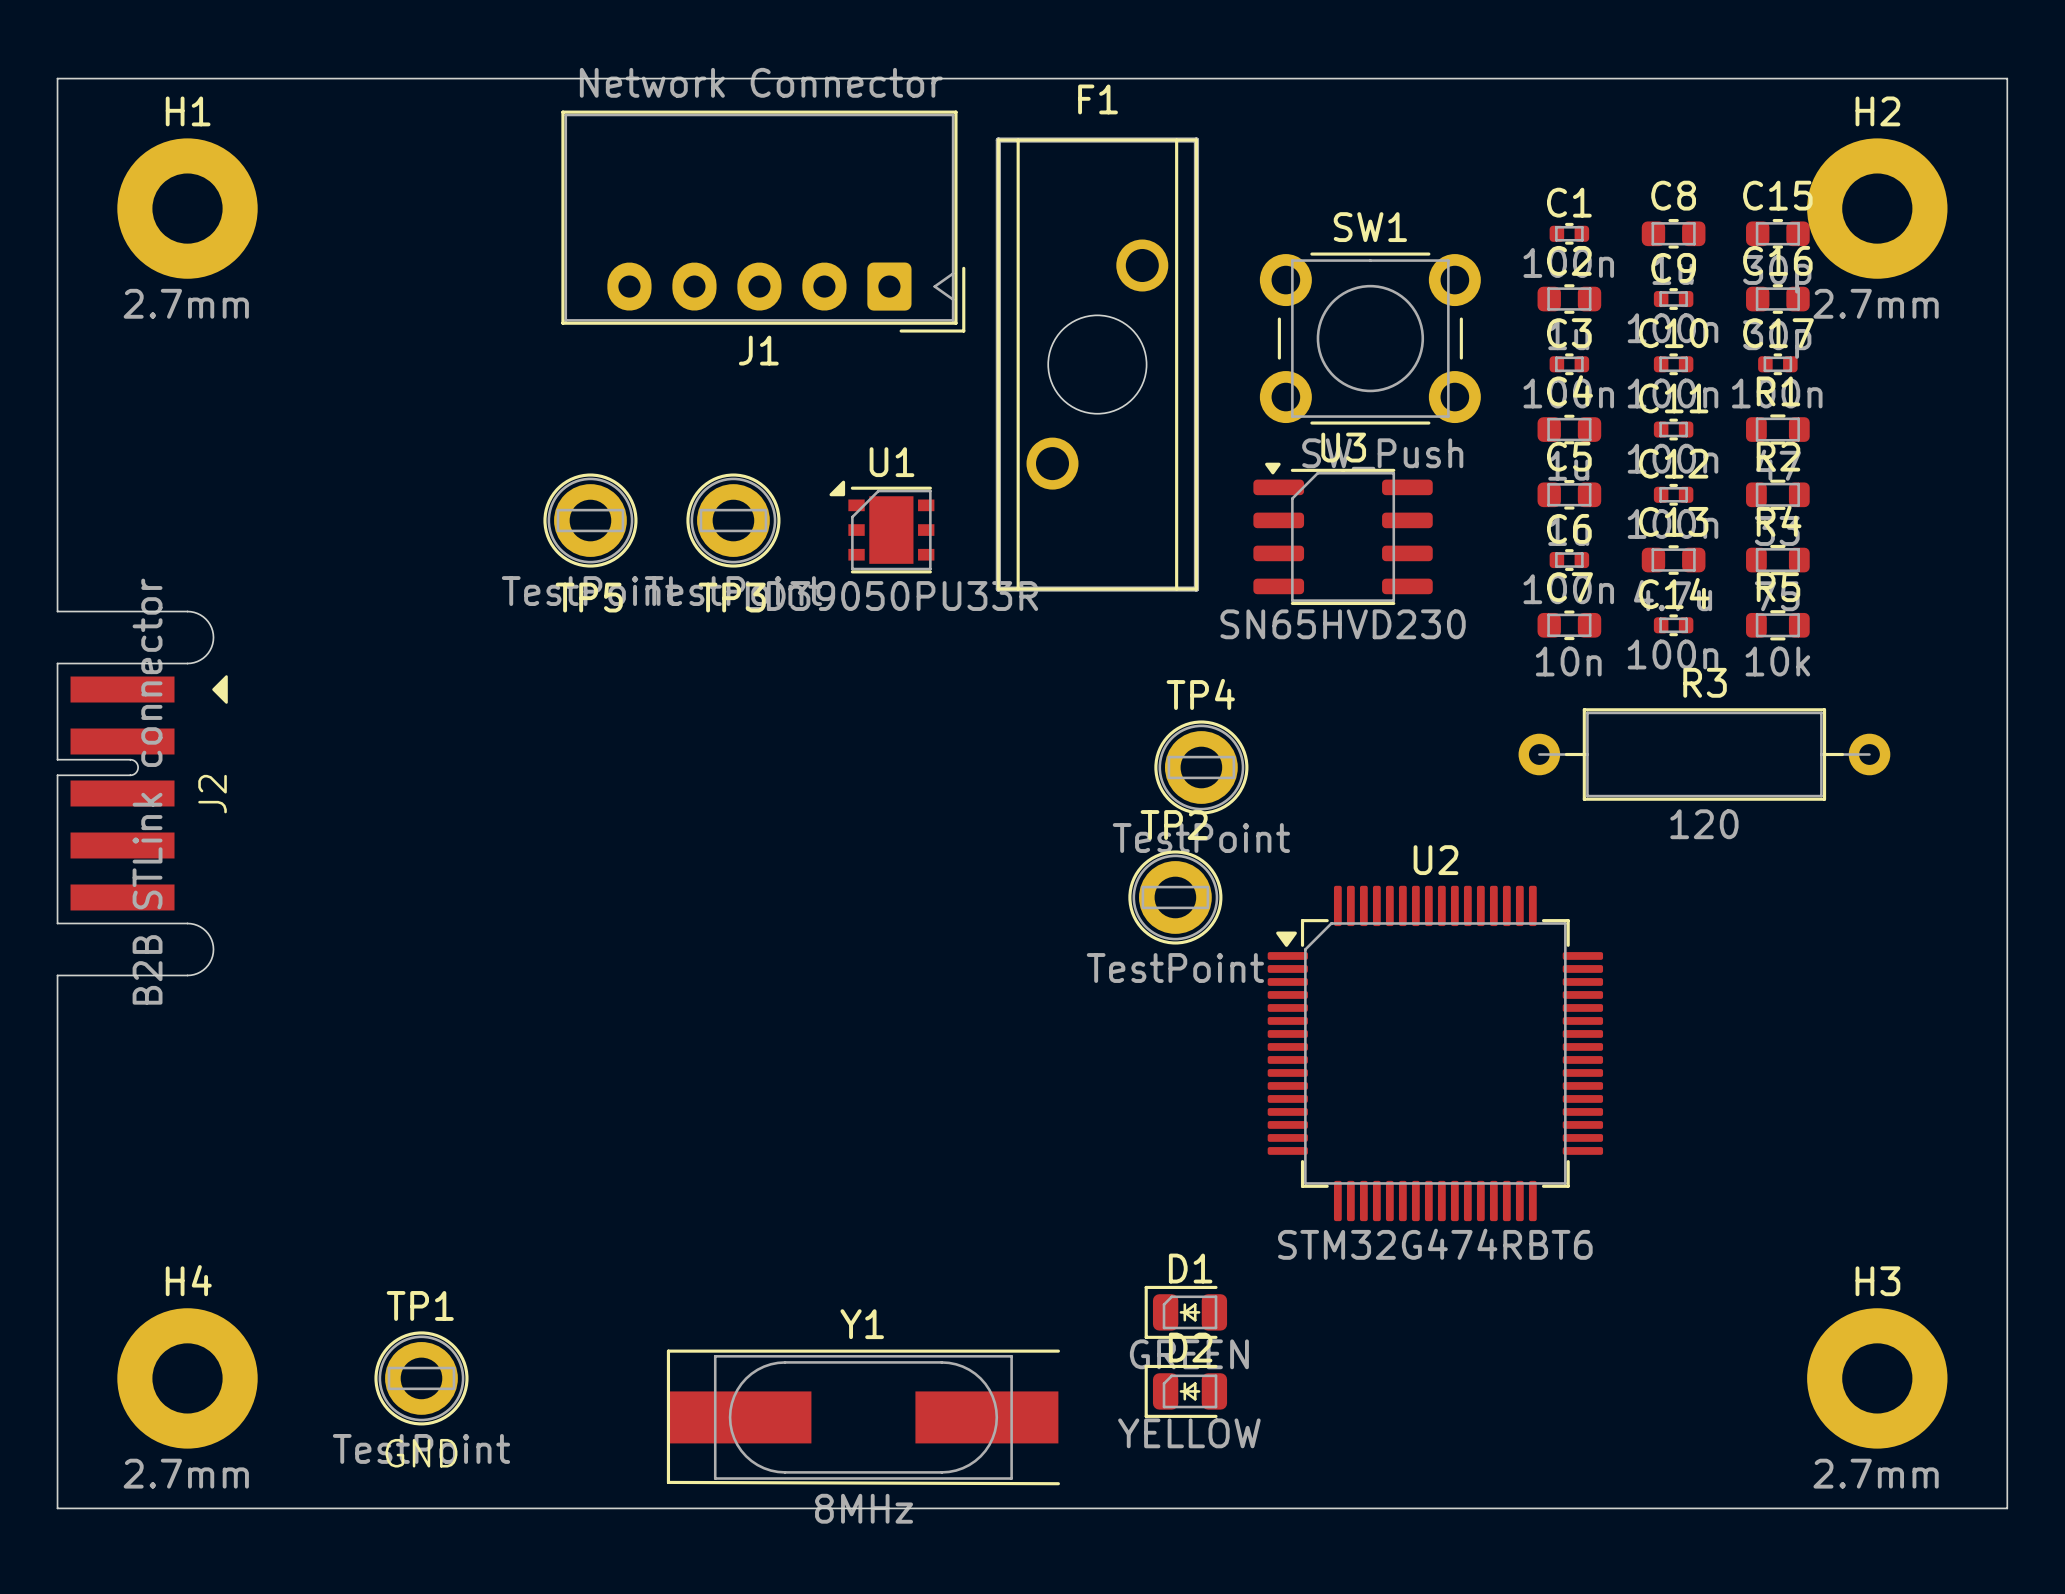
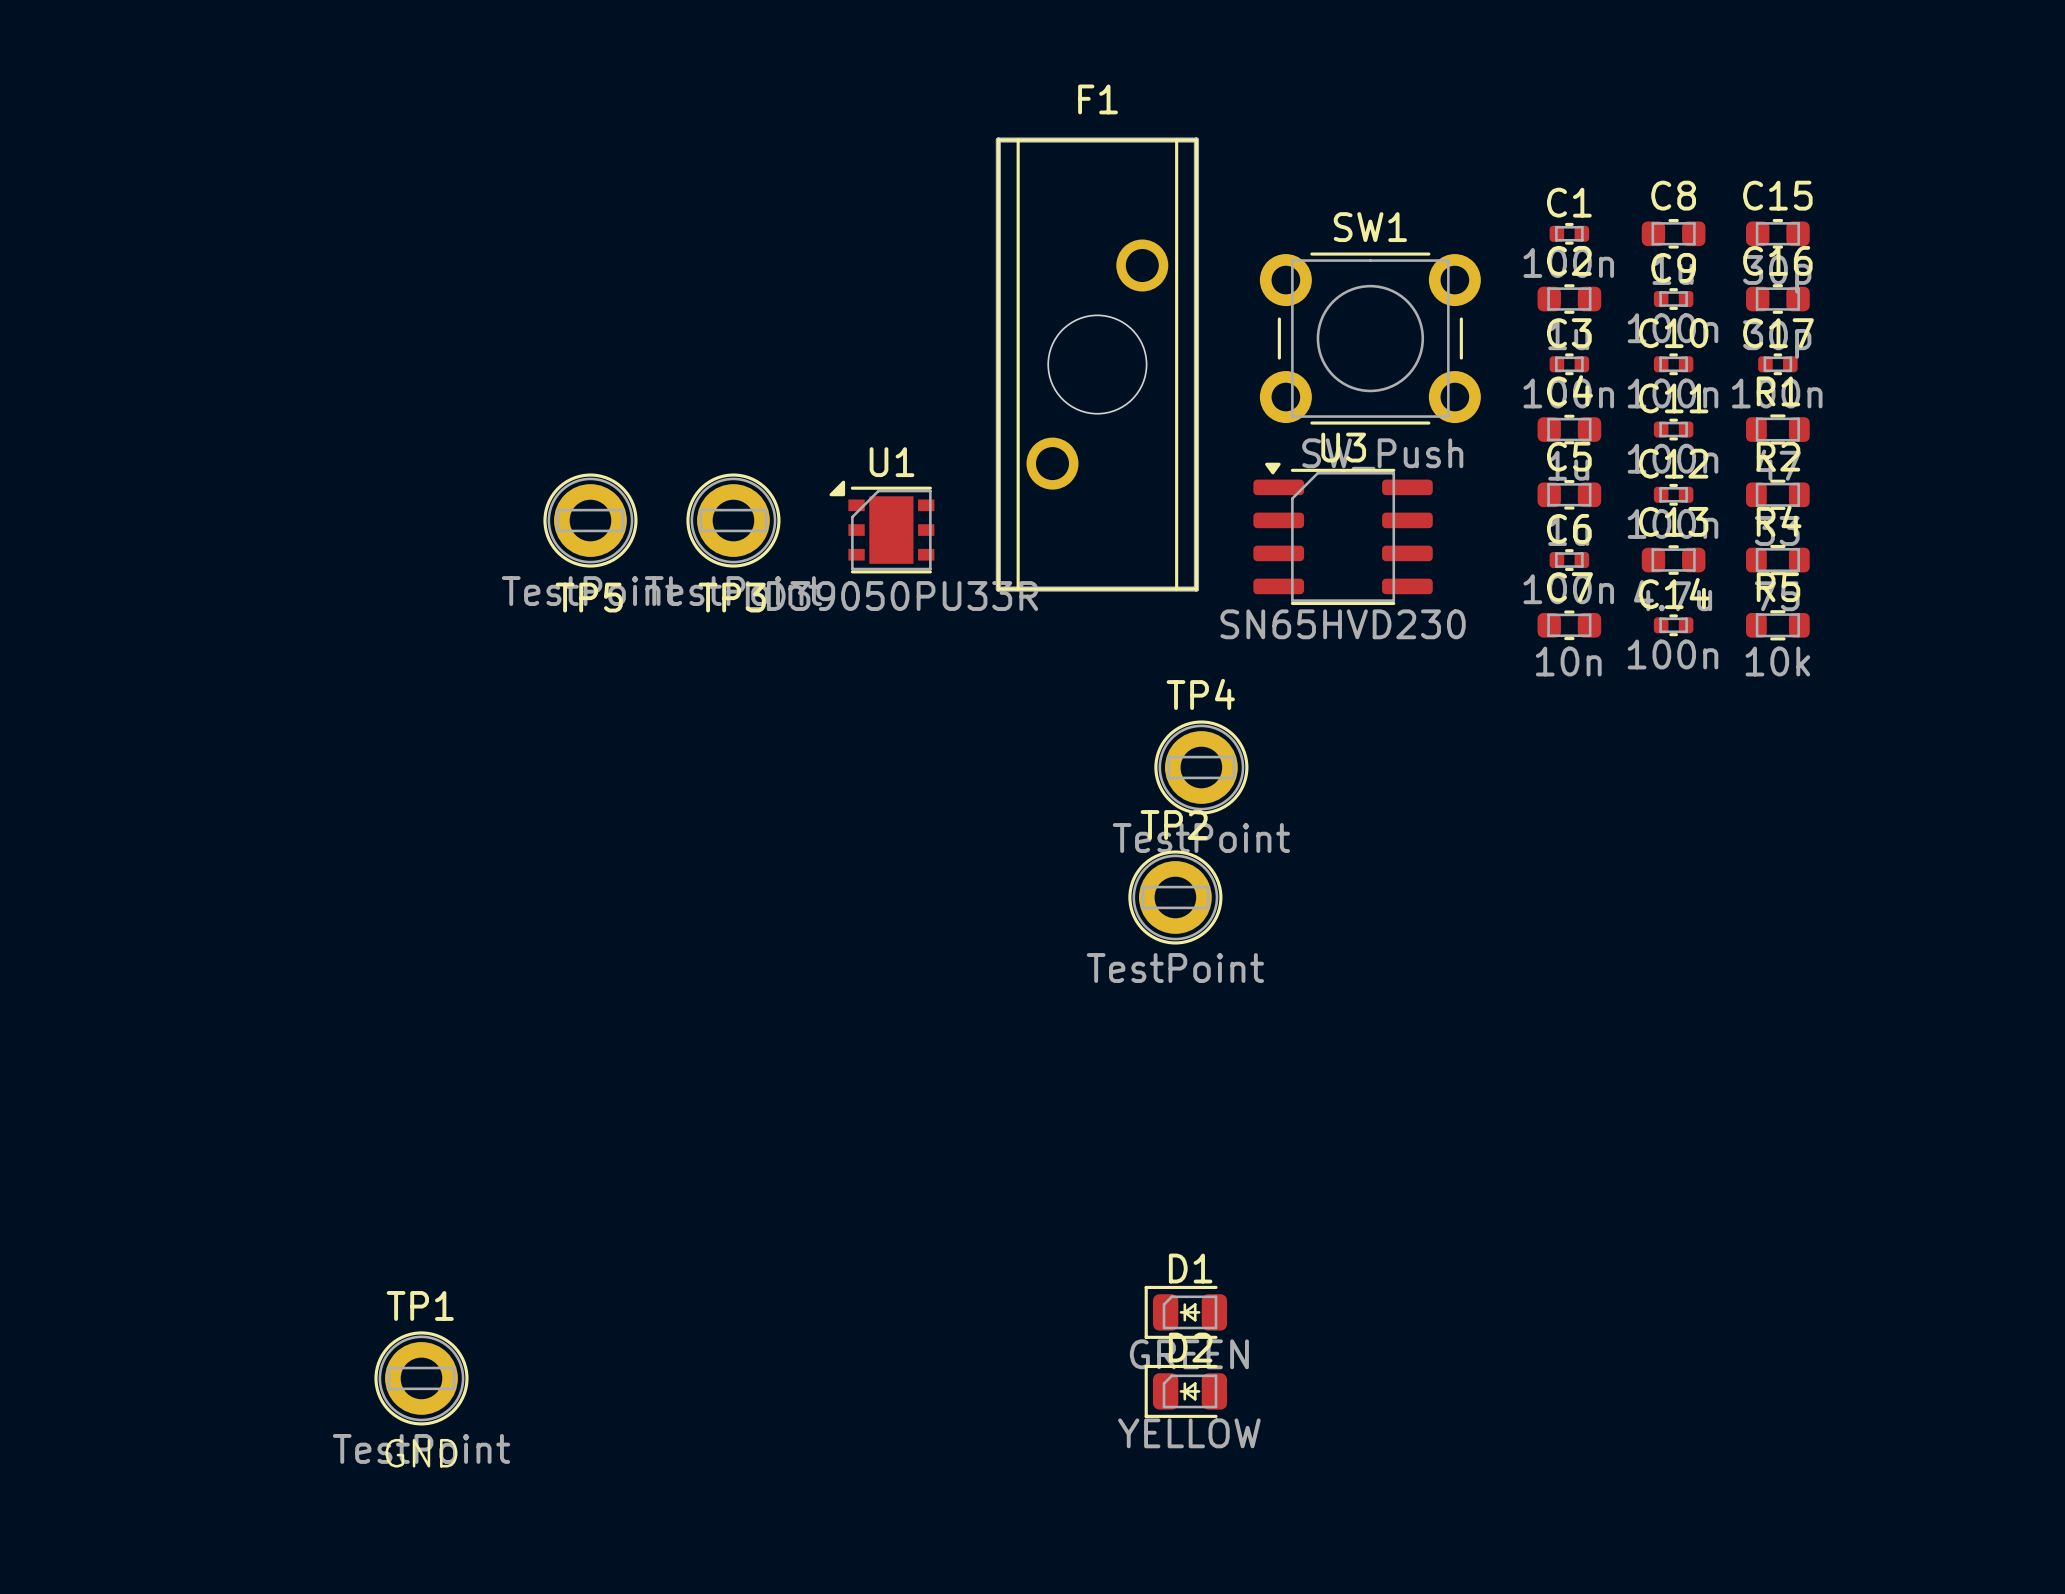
H1: 2.7mm (187, 208) -> none
H2: 2.7mm (1877, 208) -> none
J1: Network Connector (763, 221) -> none
board edge: (57, 611) (57, 78) (2007, 78) (2007, 1508) (57, 1508) (57, 975) -> none
R3: 120 (1704, 754) -> none
J2: B2B STLink connector (142, 793) -> none
U2: STM32G474RBT6 (1435, 1053) -> none
H4: 2.7mm (187, 1378) -> none
H3: 2.7mm (1877, 1378) -> none
Y1: 8MHz (863, 1417) -> none

